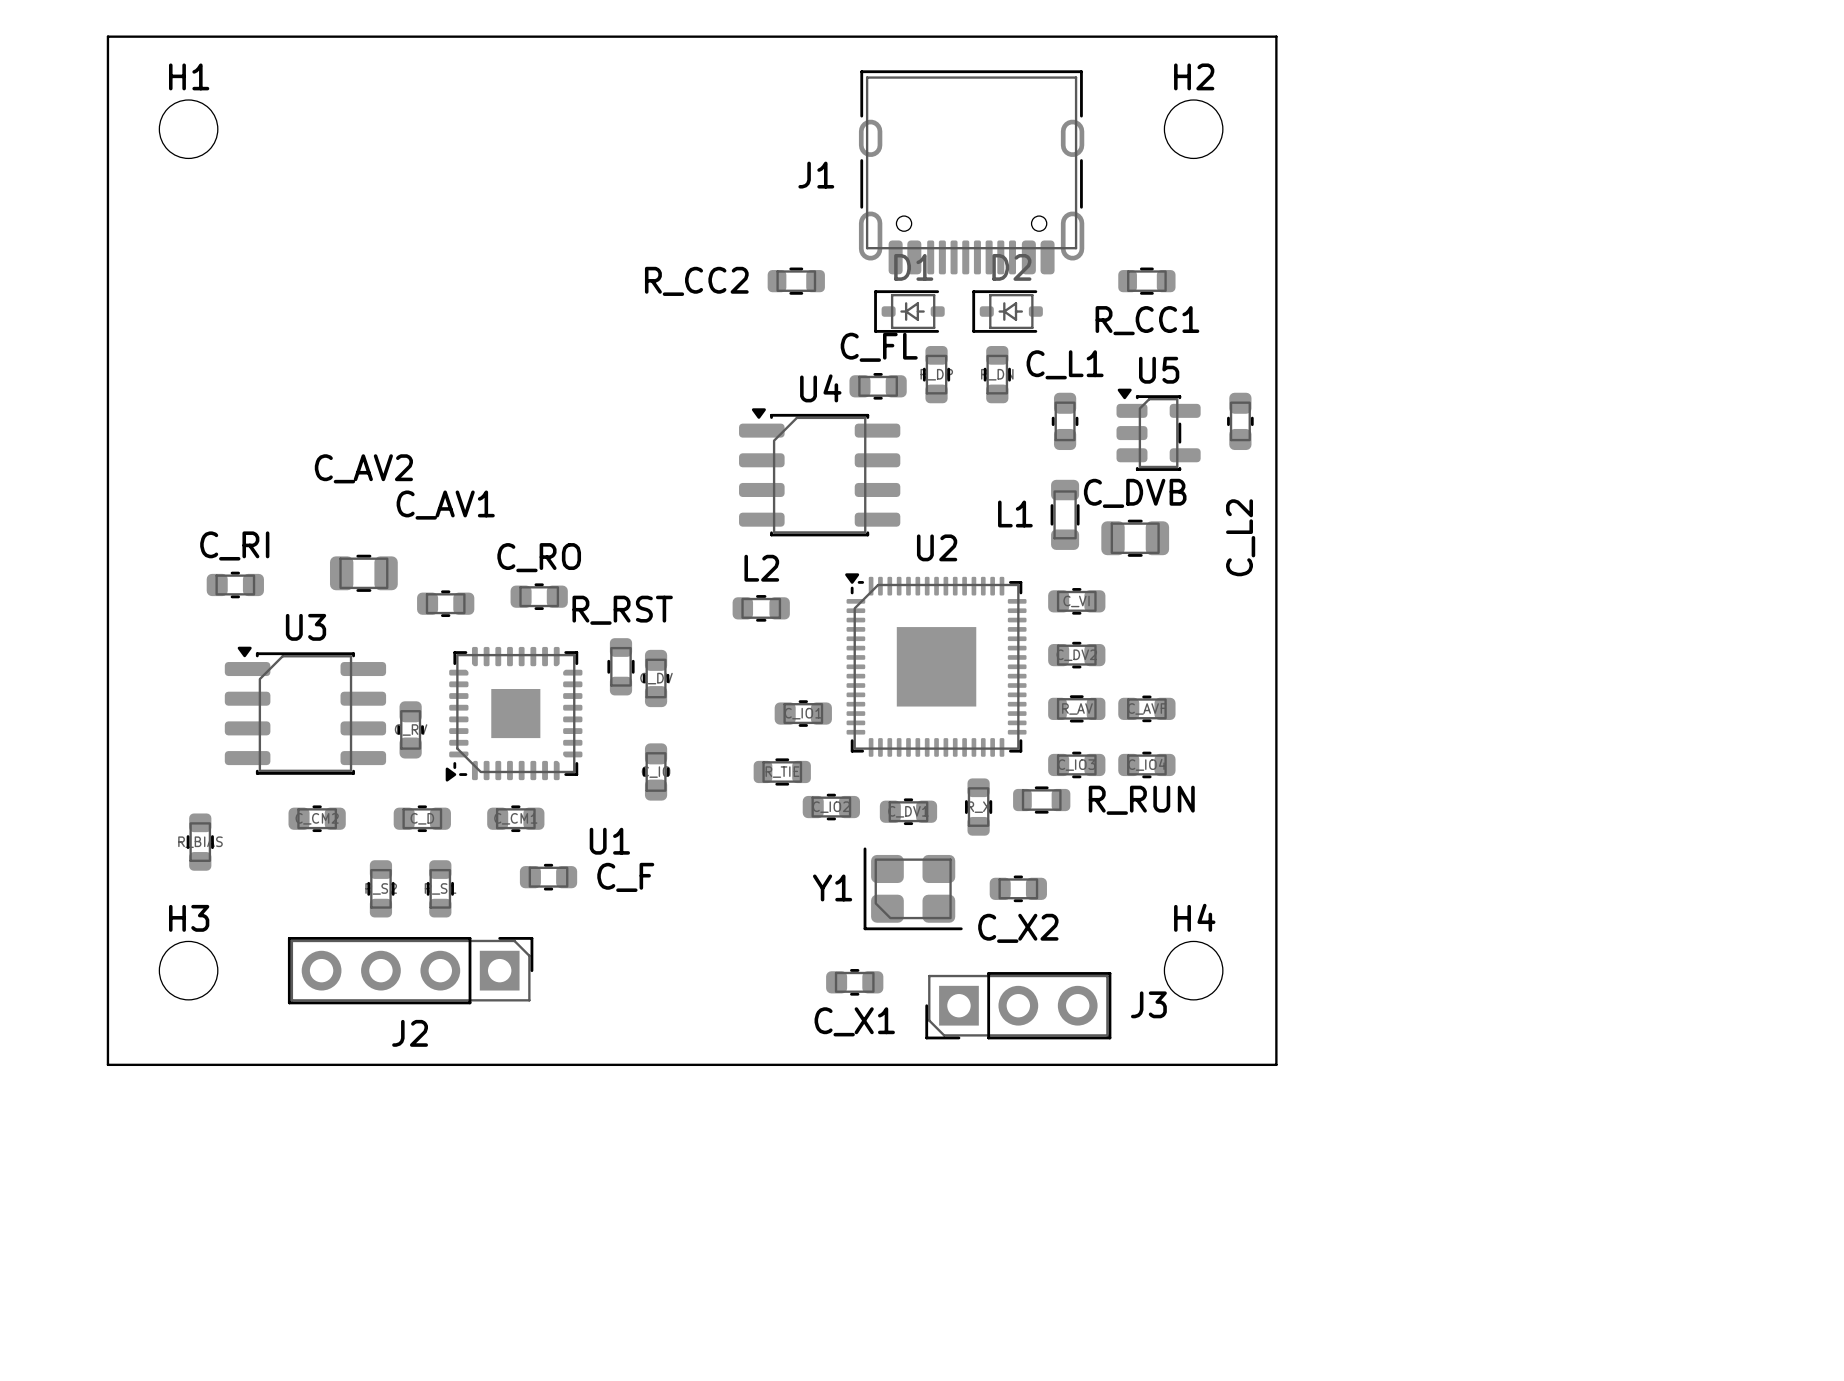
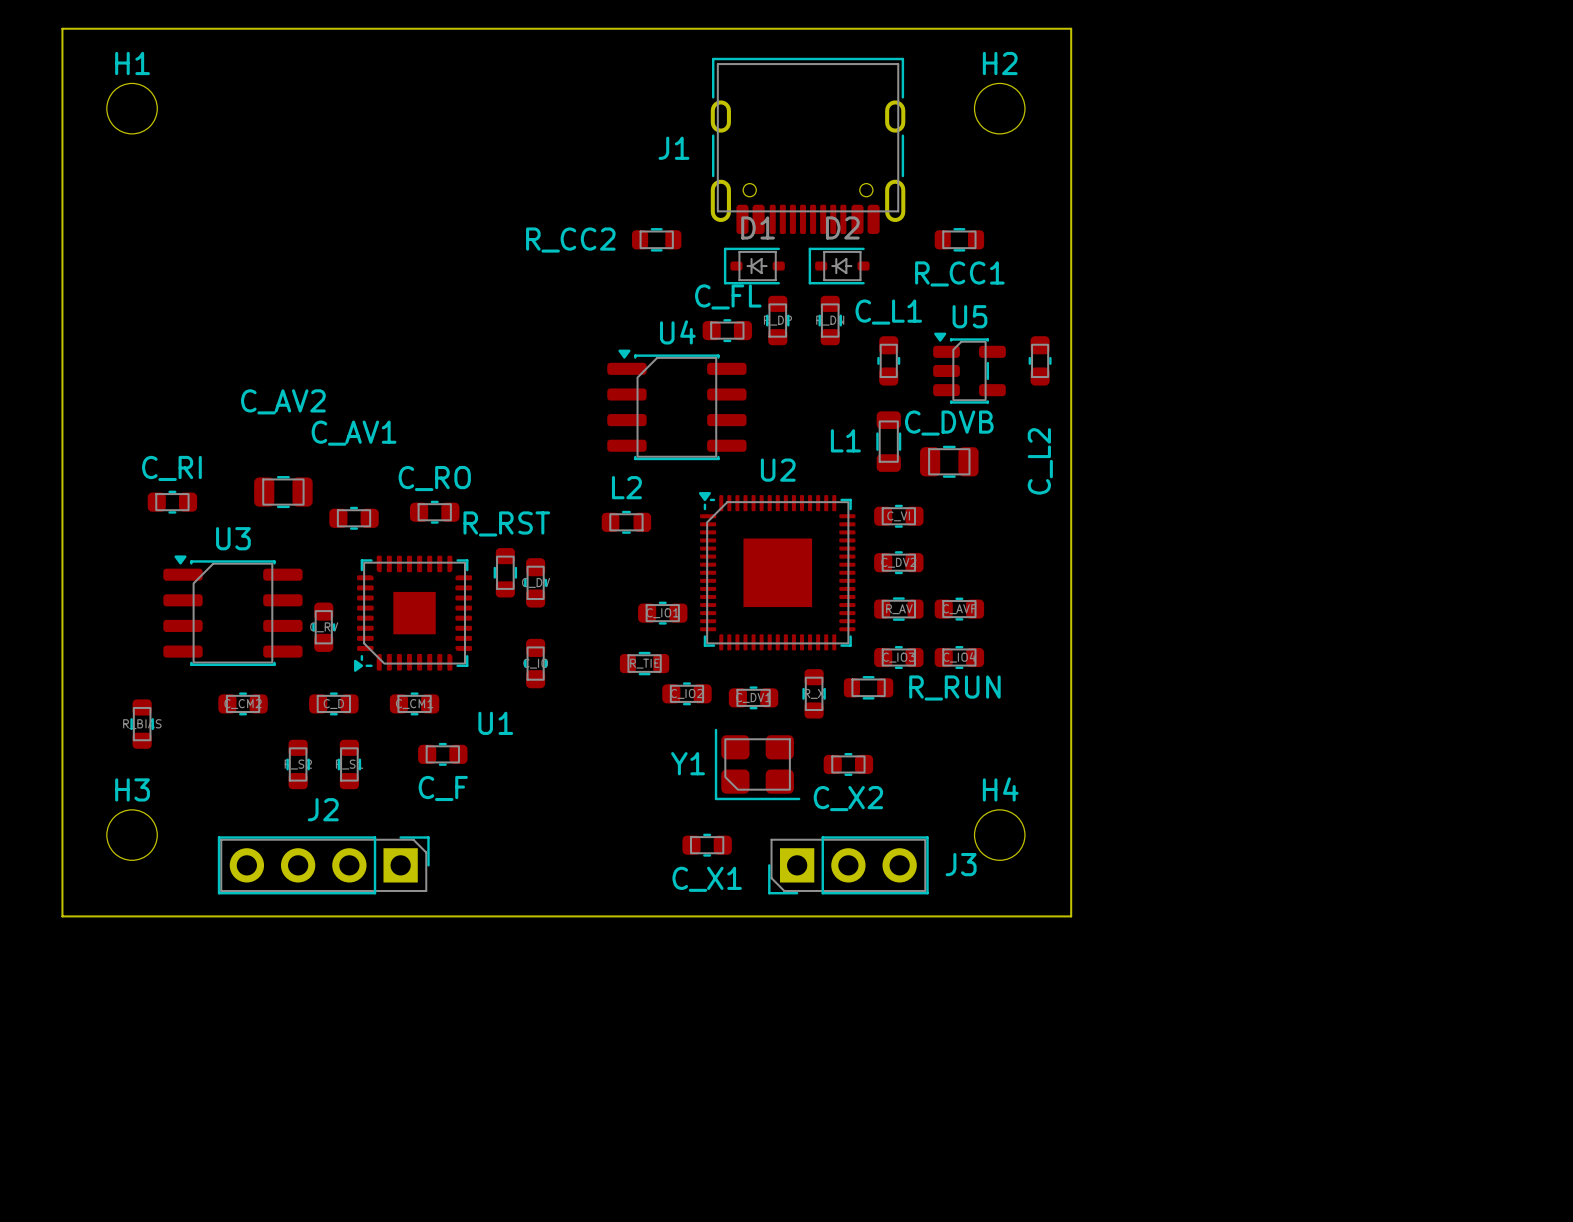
C_F name position: C_F (625, 877) -> C_F (443, 788)
J2 position: (410, 970) -> (323, 865)
J2 name position: J2 (410, 1033) -> J2 (323, 809)

